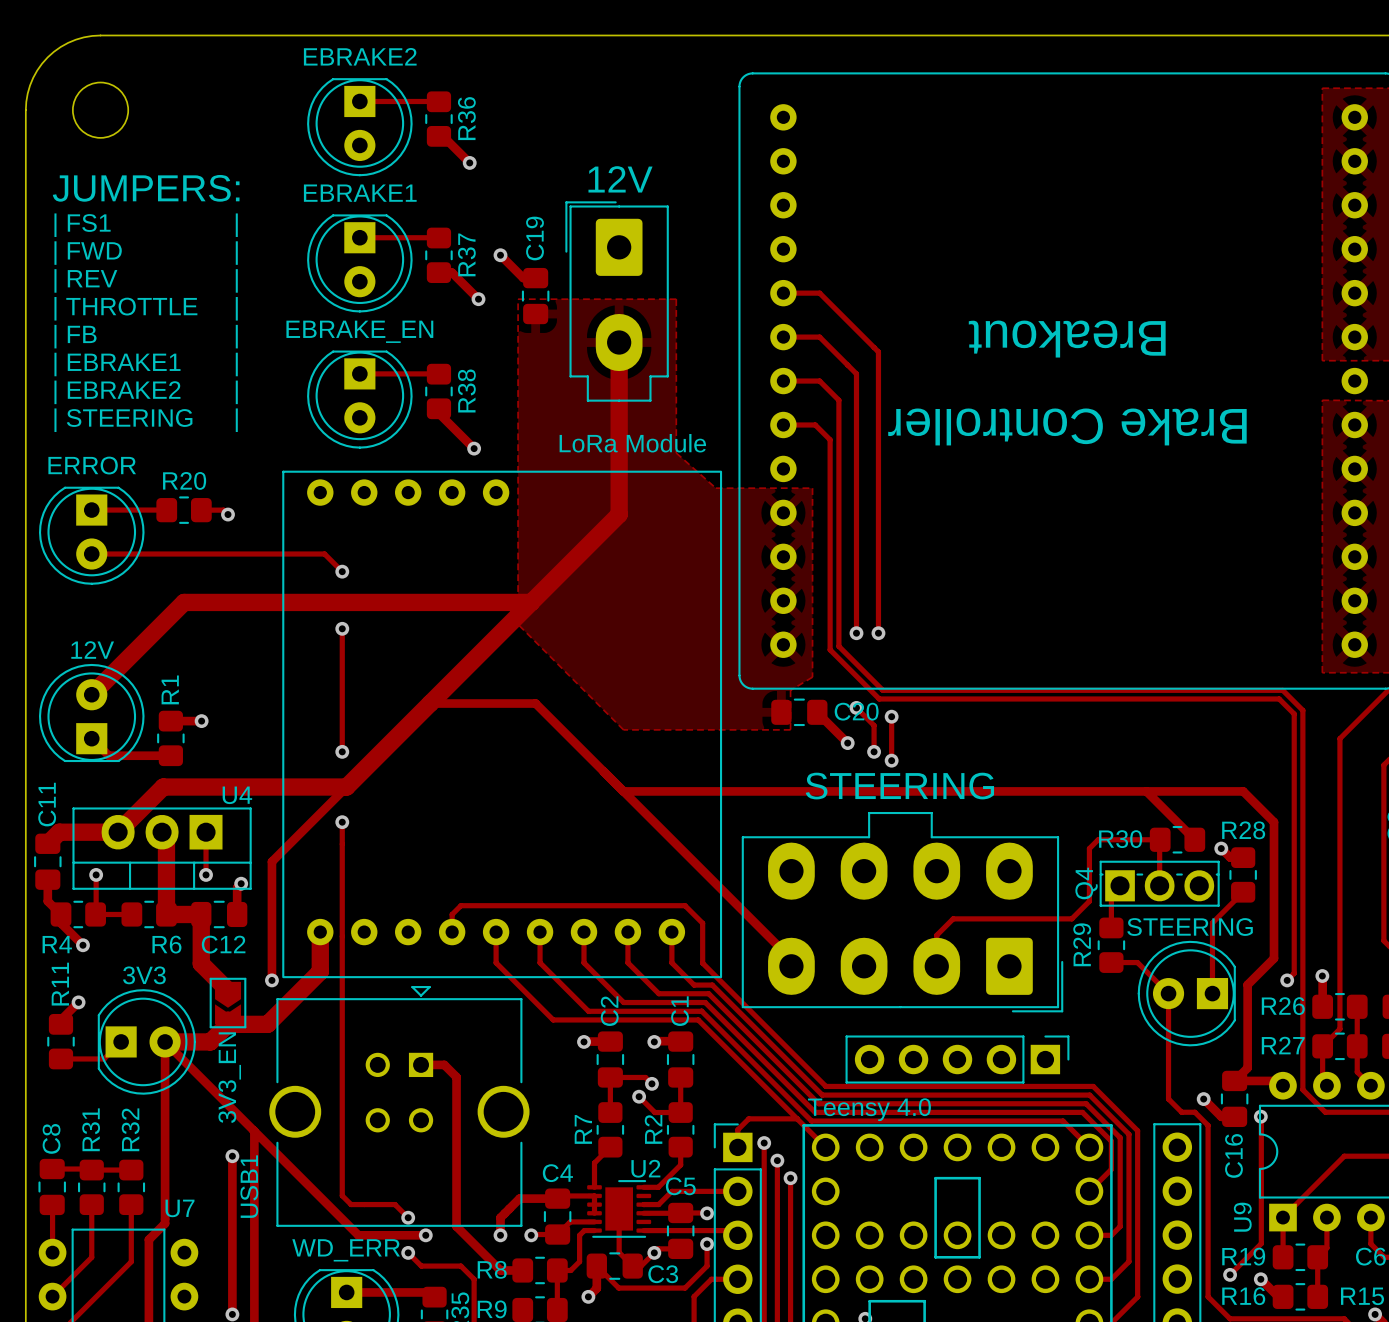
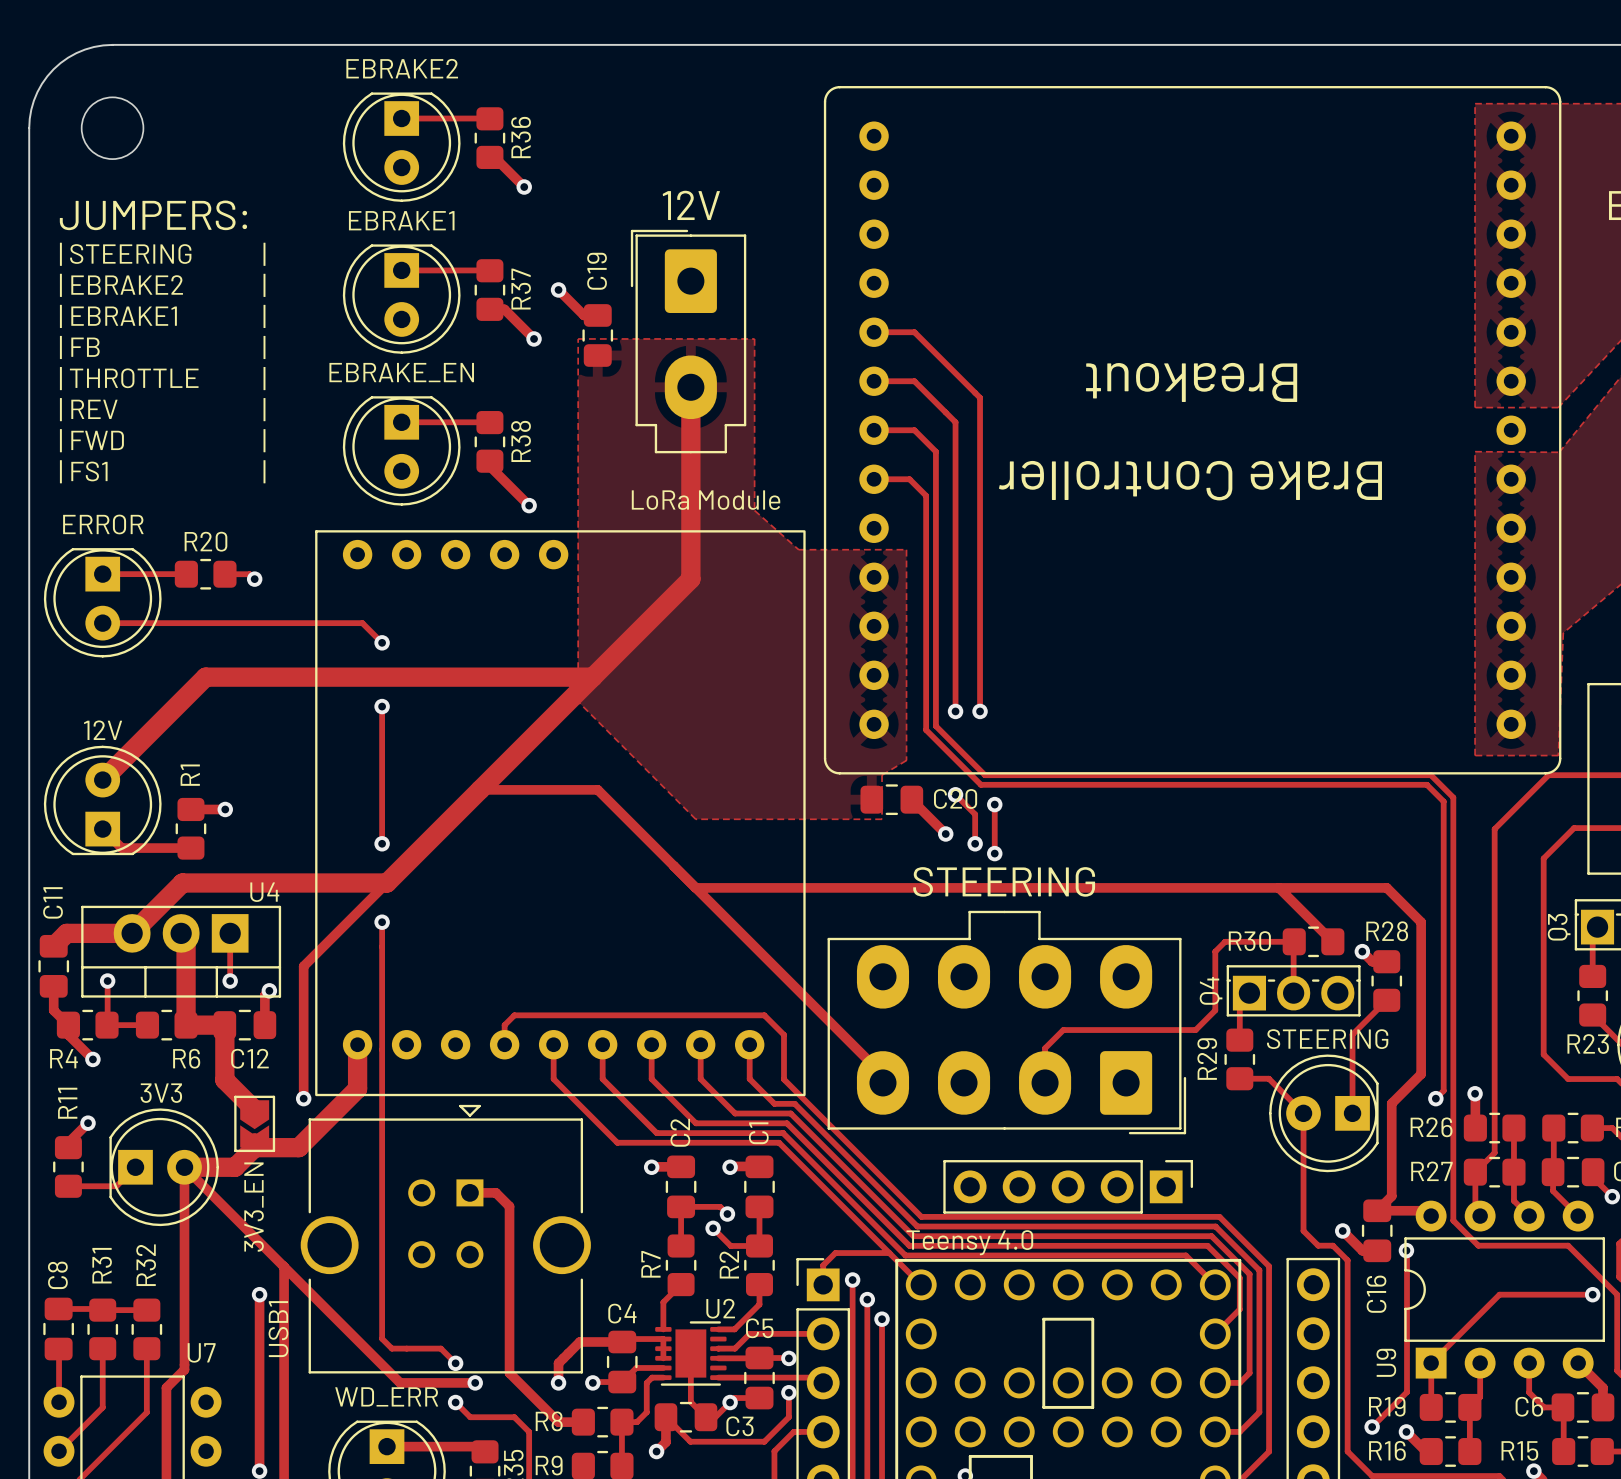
text: | FS1 (82, 225) -> | STEERING (125, 254)
text: | FWD (88, 253) -> | EBRAKE2 (121, 285)
text: | REV (85, 280) -> | EBRAKE1 (118, 316)
text: | THROTTLE (125, 308) -> | FB (79, 347)
text: | FB (75, 336) -> | THROTTLE (129, 378)
text: | EBRAKE1 (117, 364) -> | REV (88, 409)
text: | EBRAKE2 (117, 392) -> | FWD (91, 440)
text: | STEERING (123, 420) -> | FS1 (83, 471)

